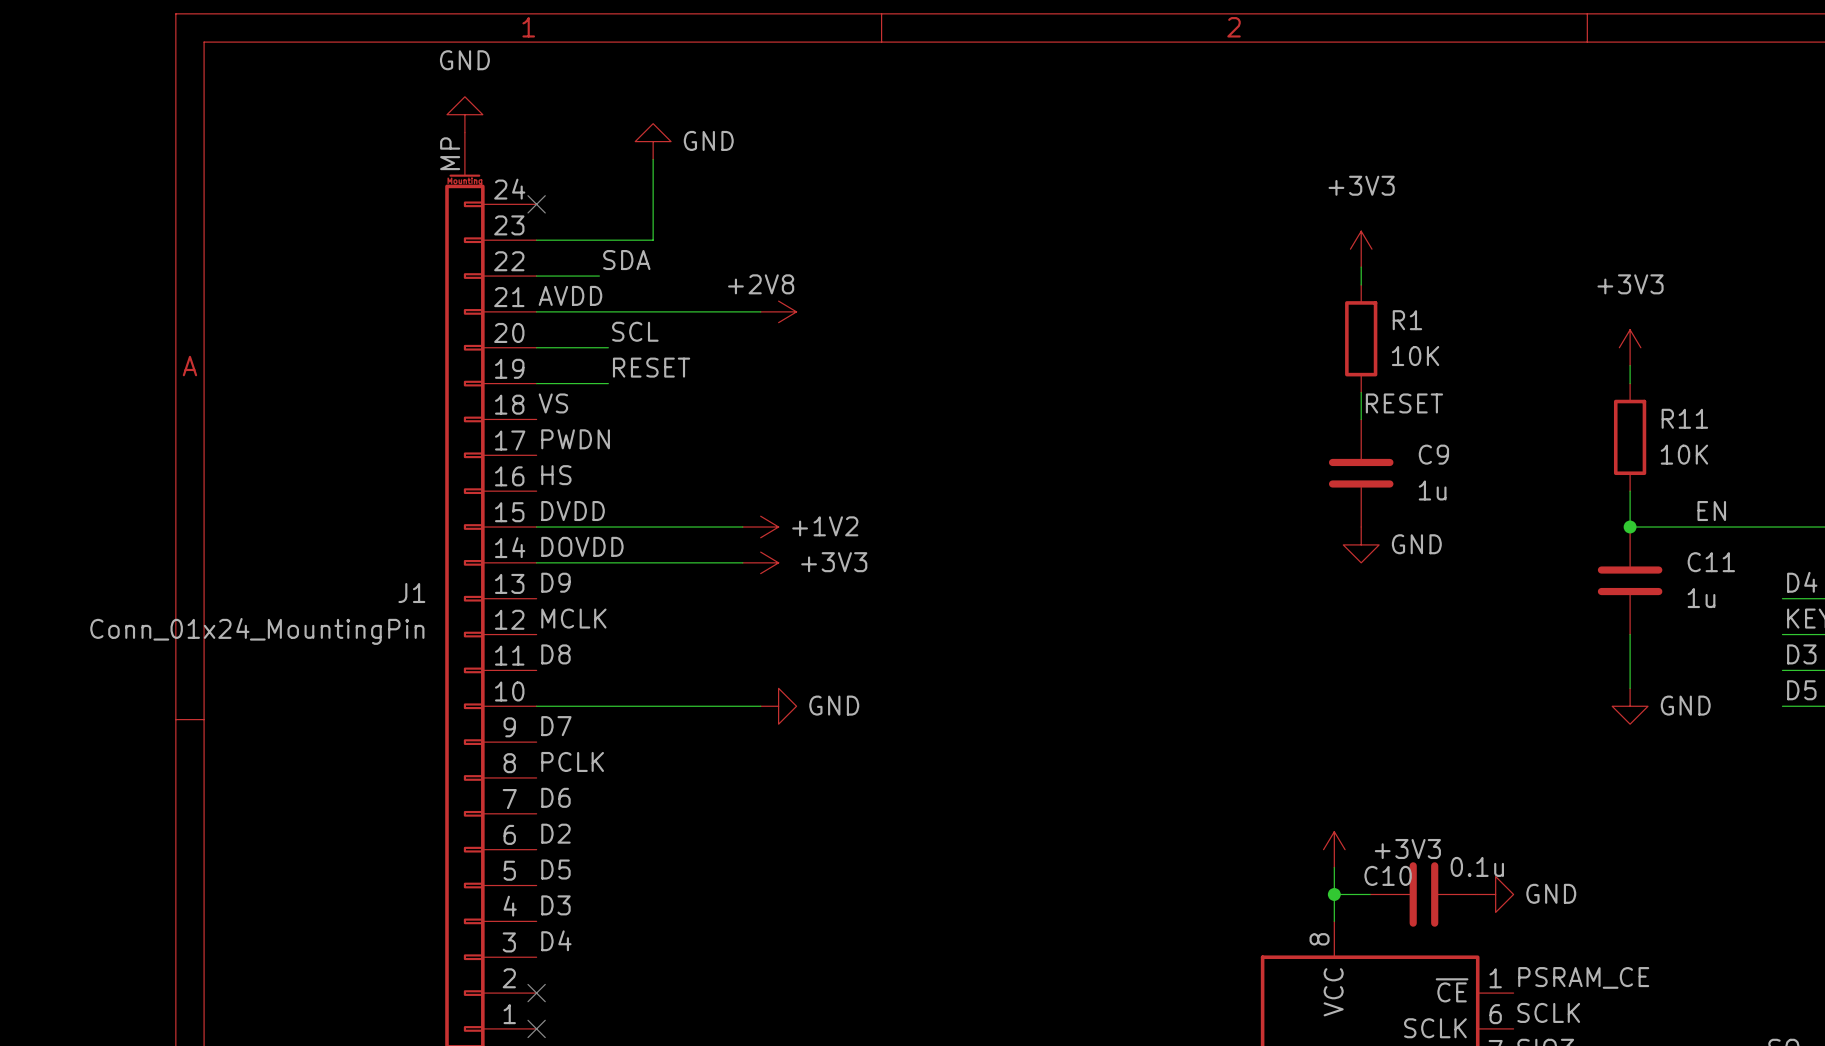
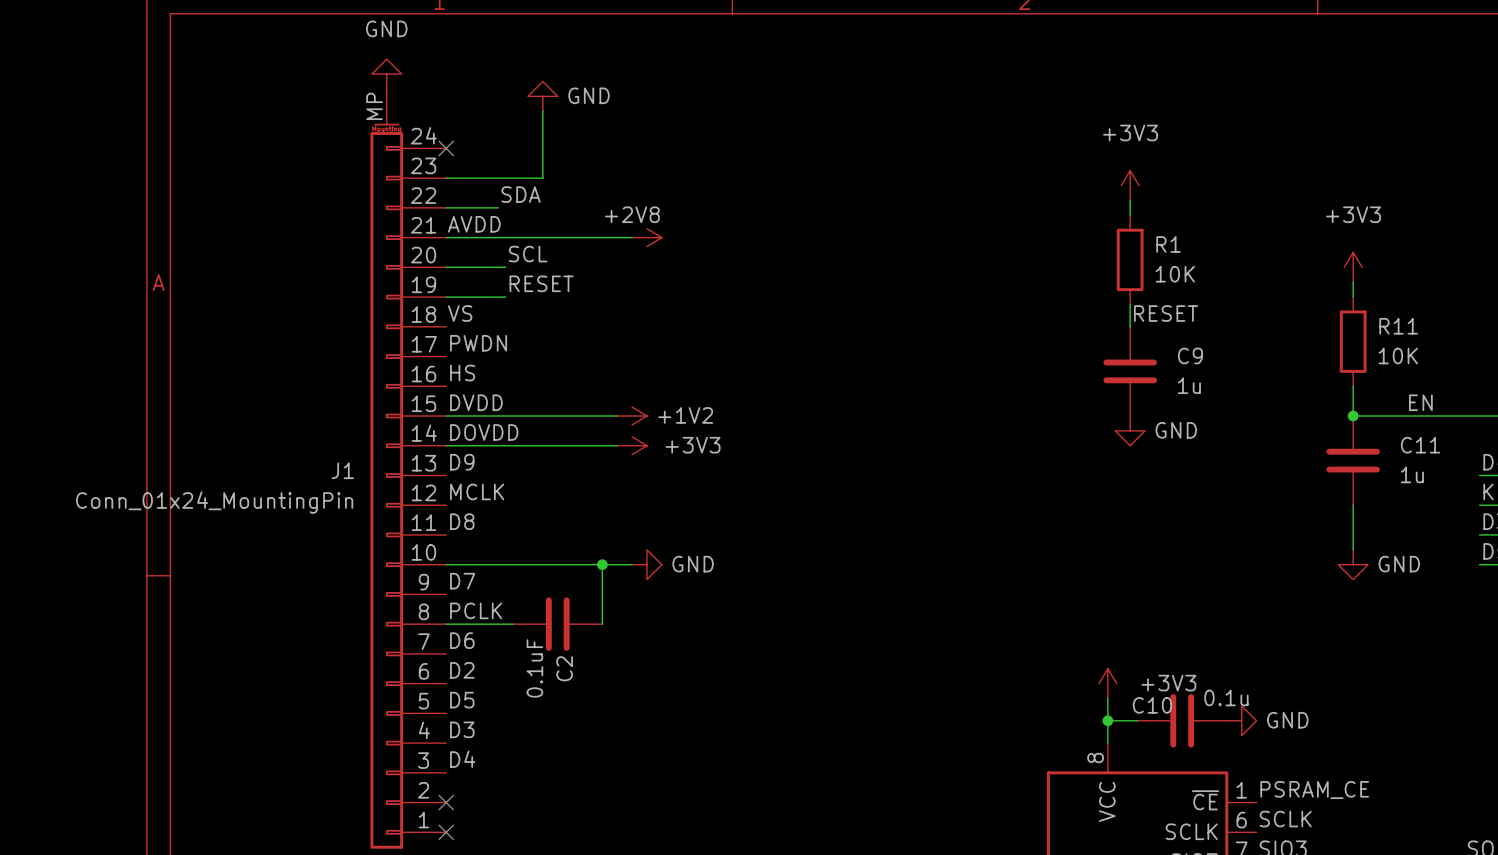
wire: none -> (602, 564) (602, 624)
junction: none -> (602, 564)
wire: none -> (446, 624) (513, 624)
C2: none -> 0.1uF (557, 624)

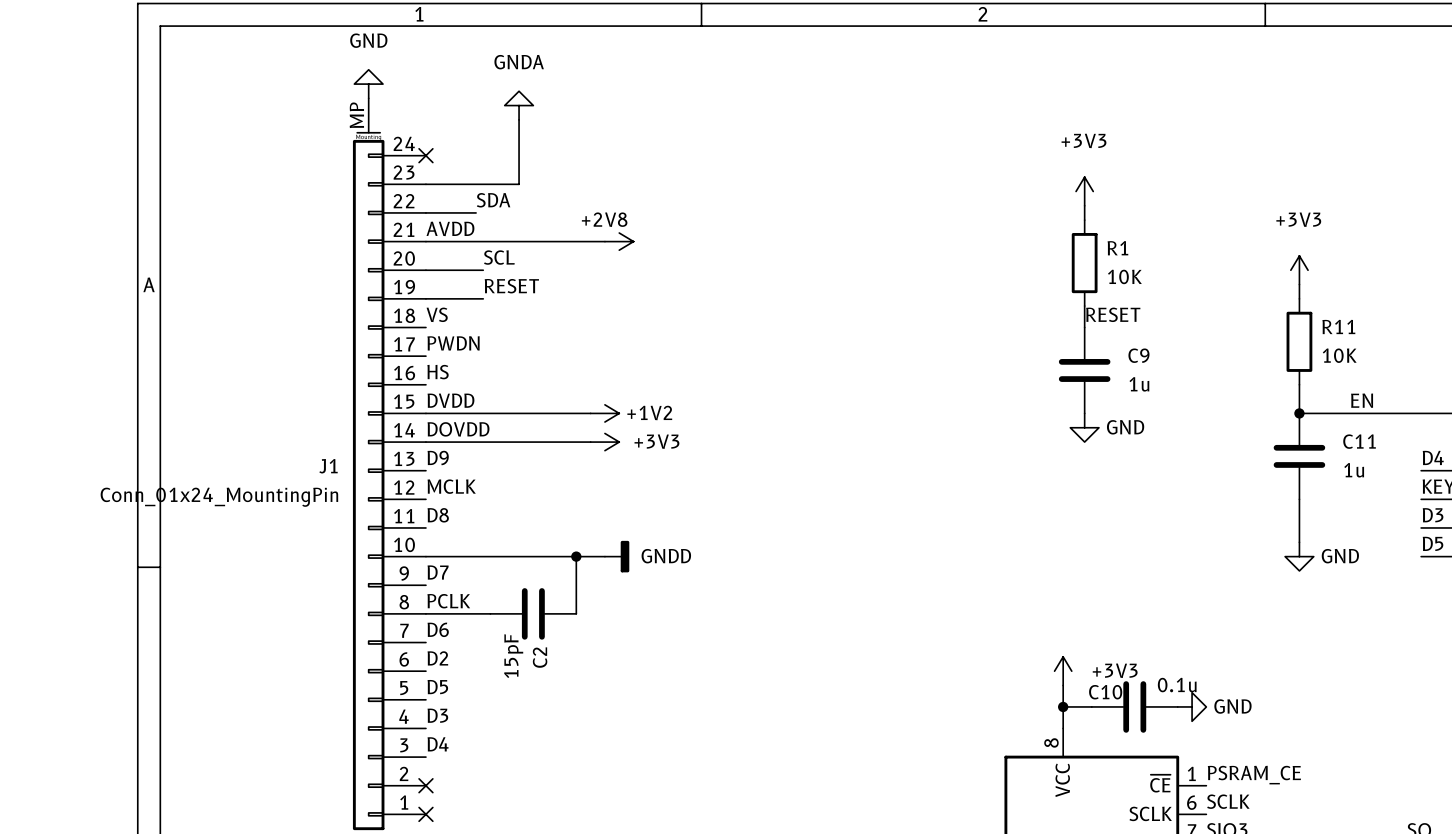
power symbol: GND (542, 96) -> GNDA (519, 105)
power symbol: GND (646, 564) -> GNDD (617, 556)
C2 value: 0.1uF (534, 668) -> 15pF (513, 656)

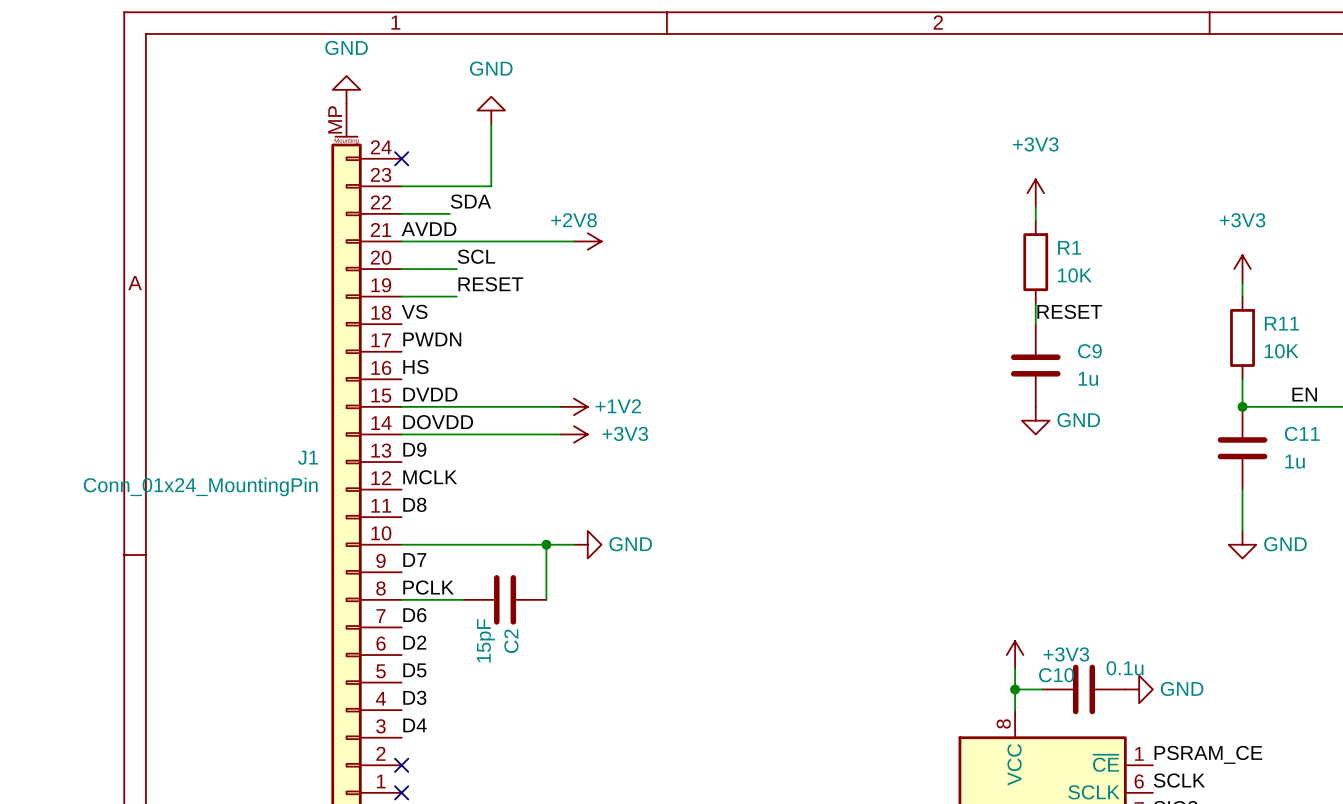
power symbol: GNDA (519, 105) -> GND (491, 110)
power symbol: GNDD (617, 556) -> GND (587, 544)

